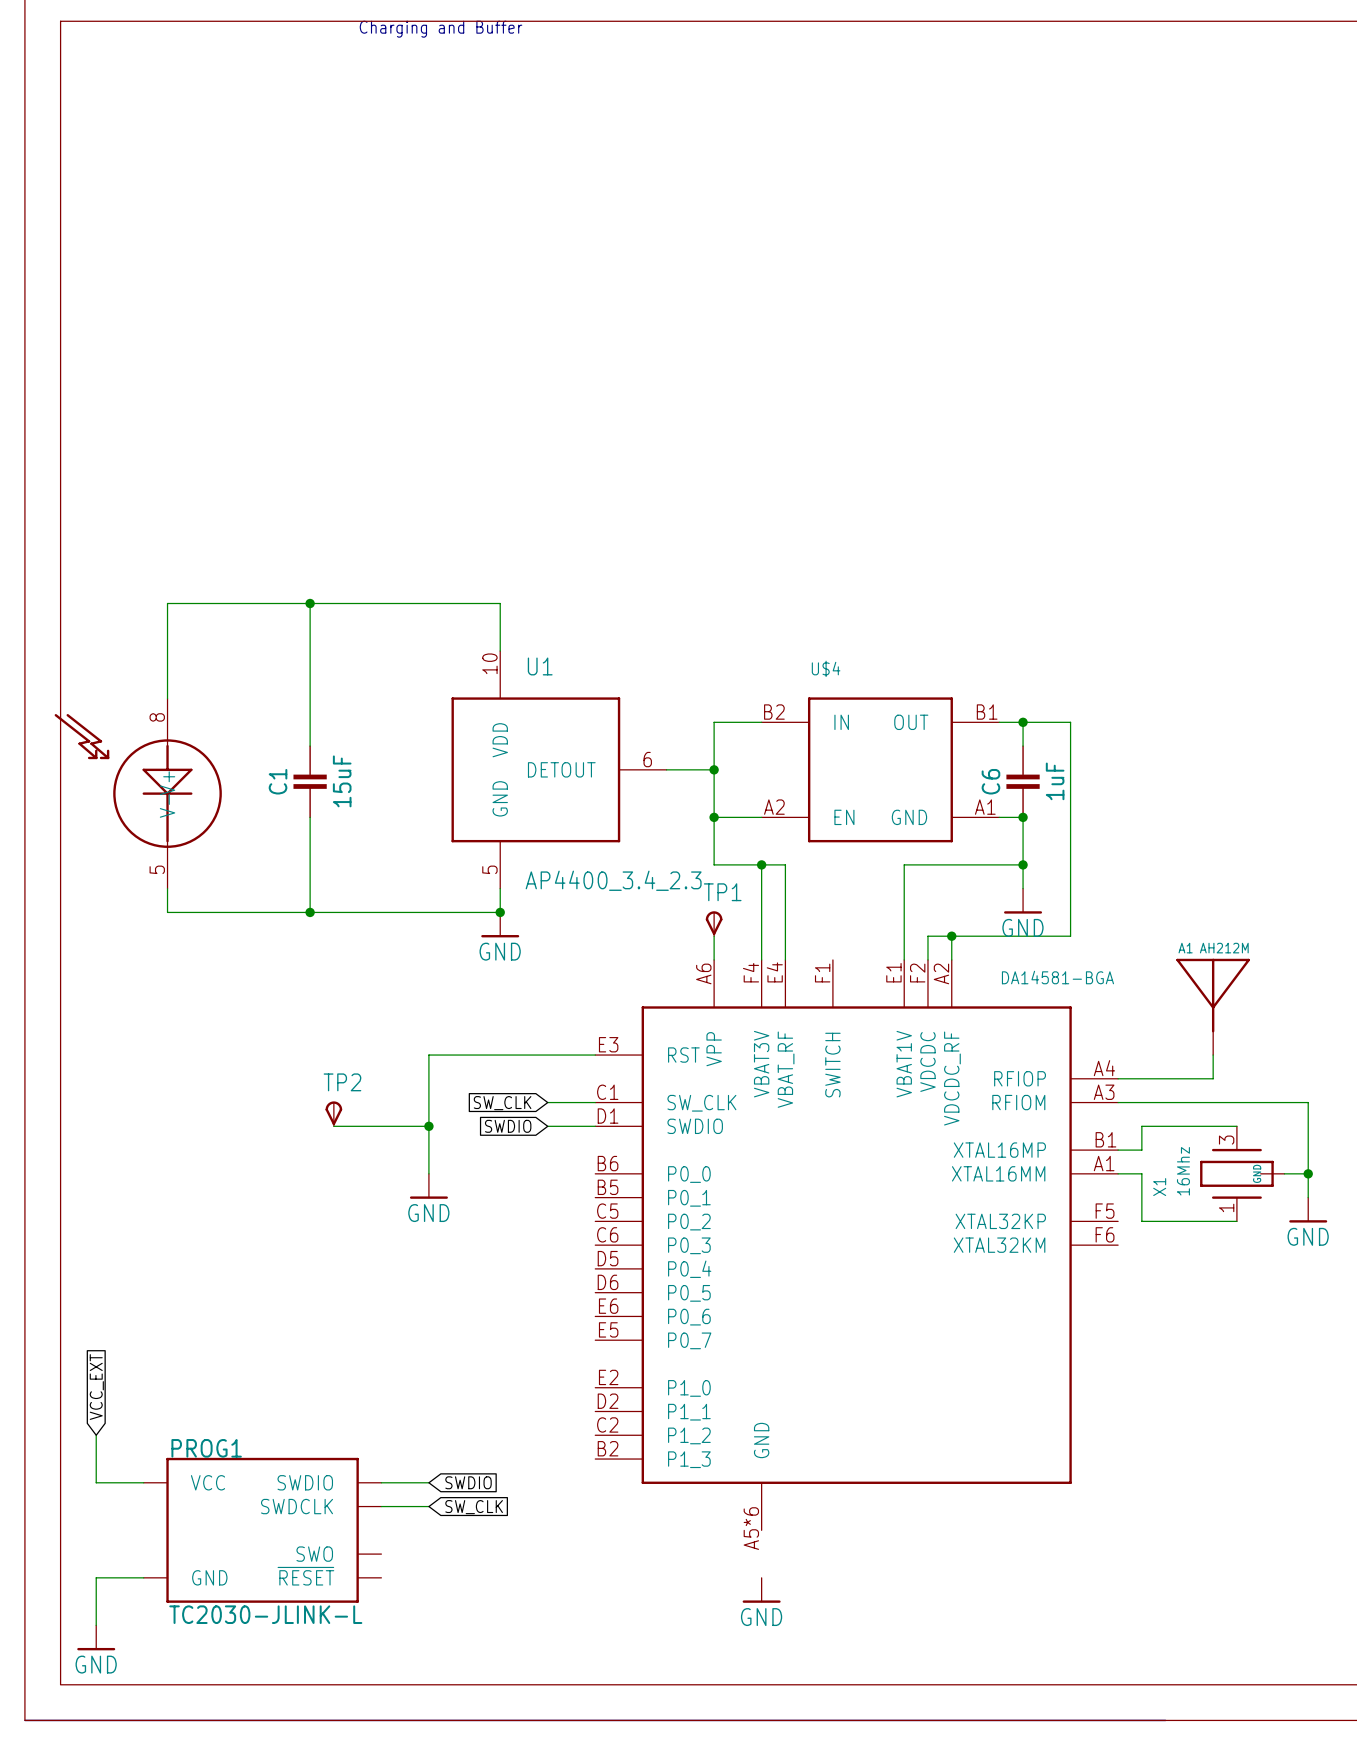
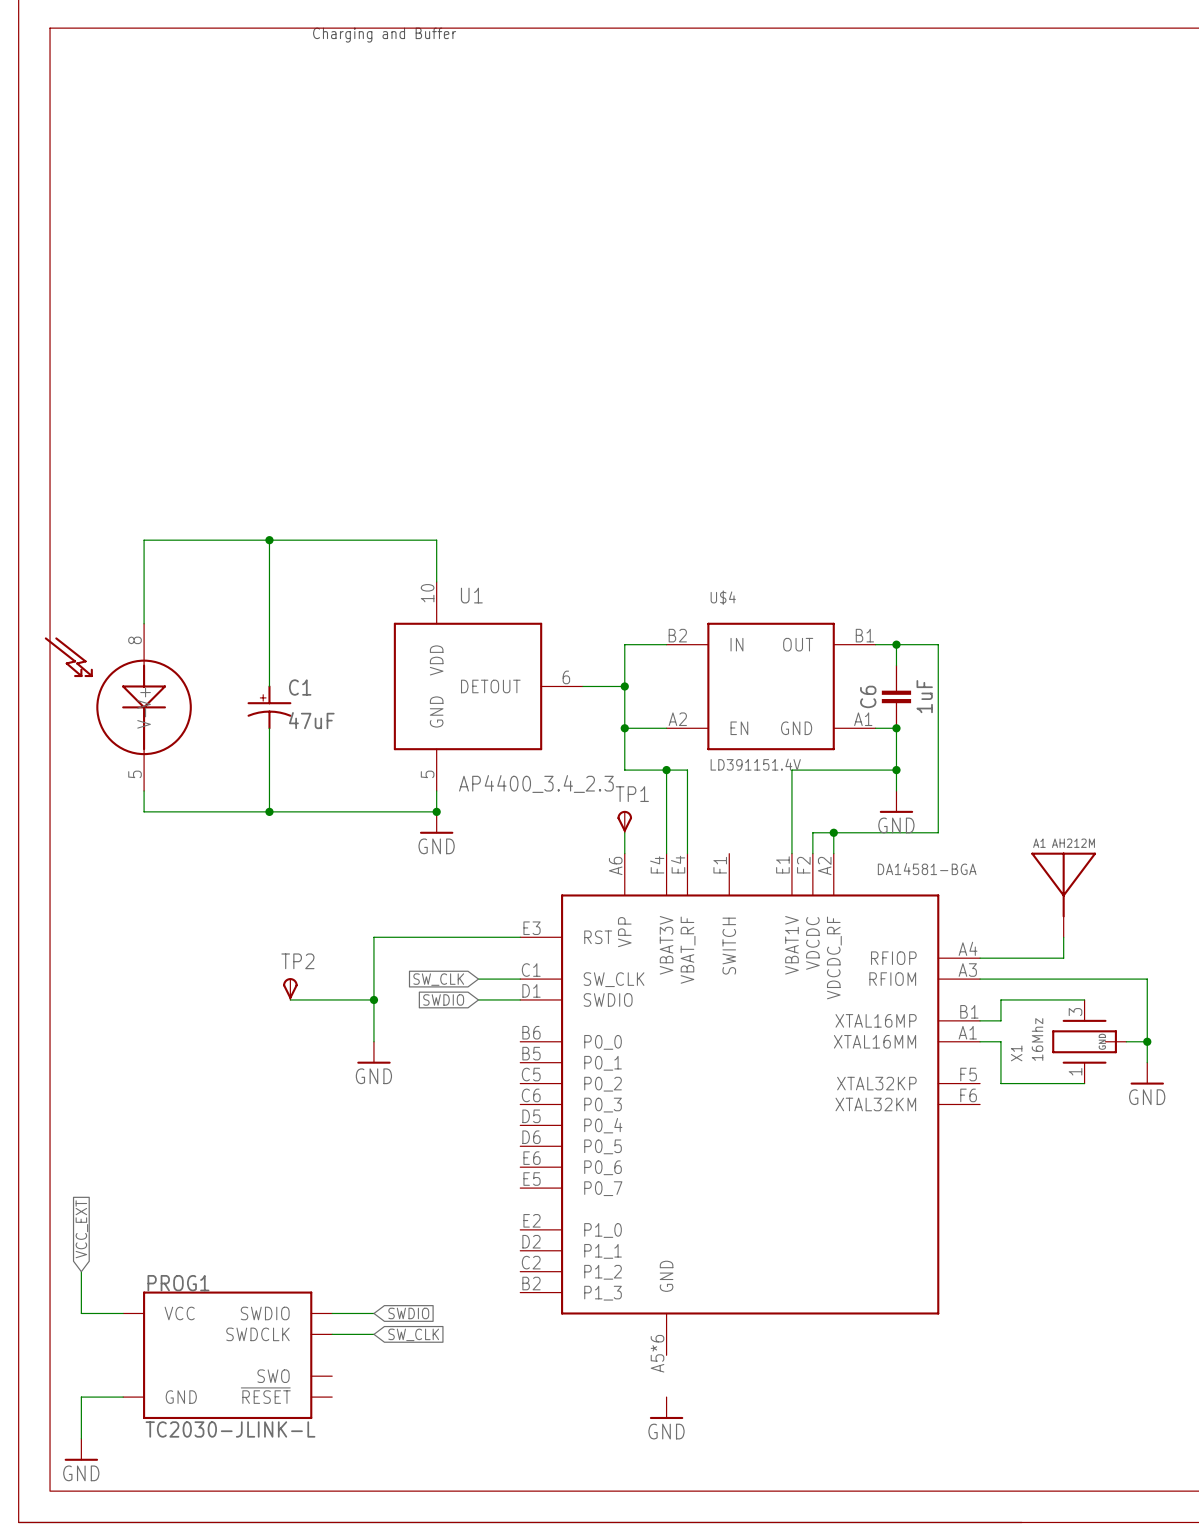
C1 symbol: [293, 745, 327, 819] -> [247, 685, 292, 730]
C1 name position: C1 (278, 781) -> C1 (300, 687)
C1 value: 15uF (342, 781) -> 47uF (311, 720)
U$4 value: none -> LD391151.4V (755, 764)

